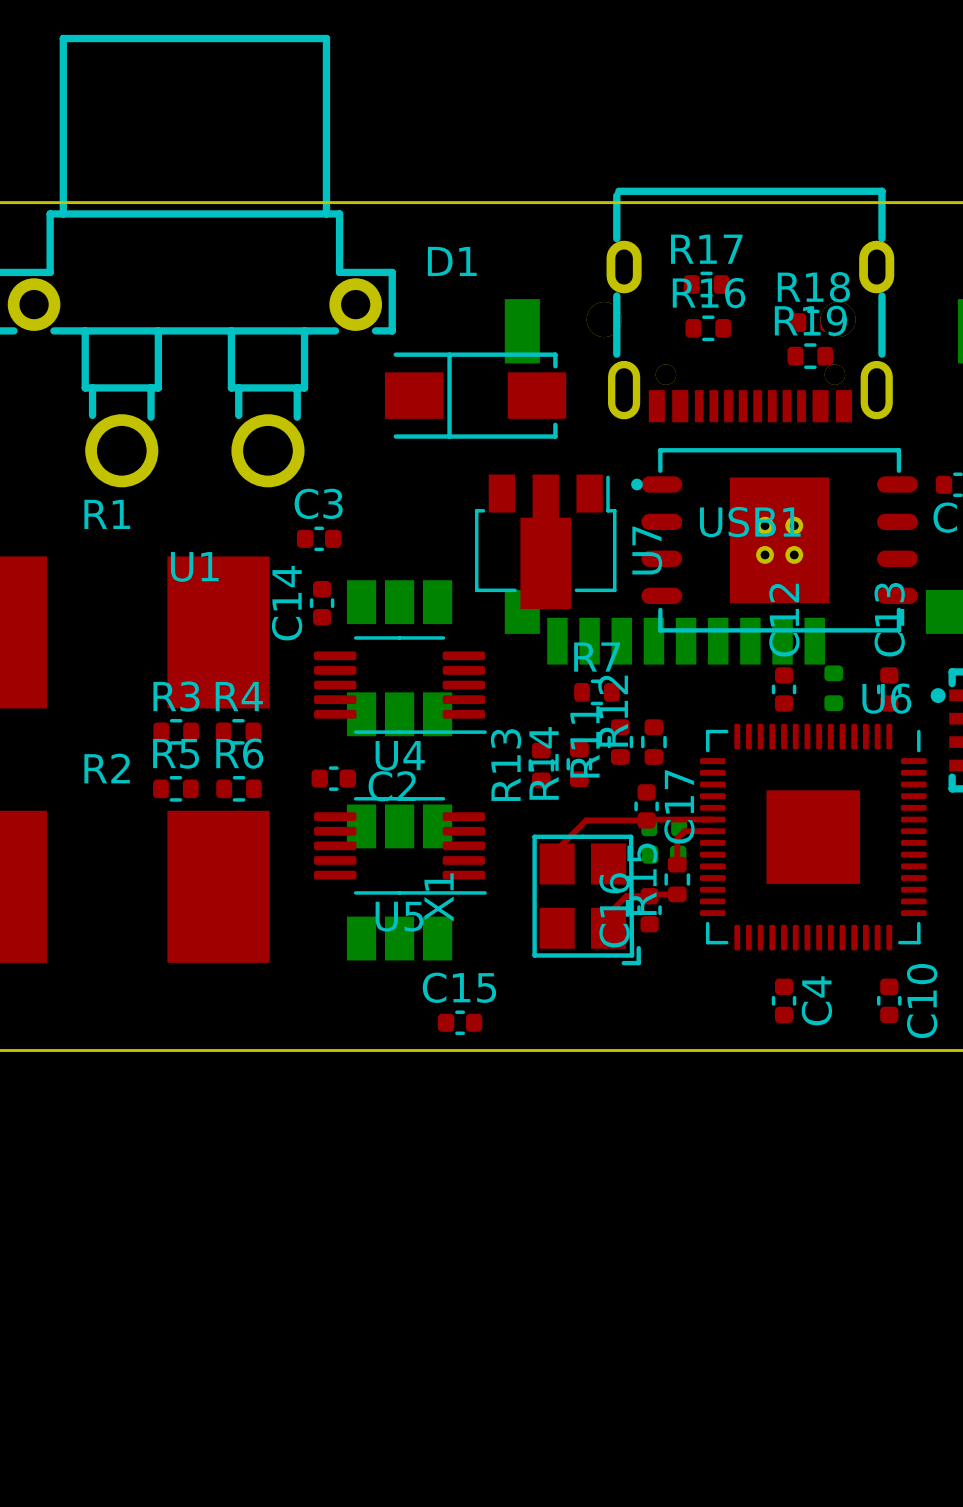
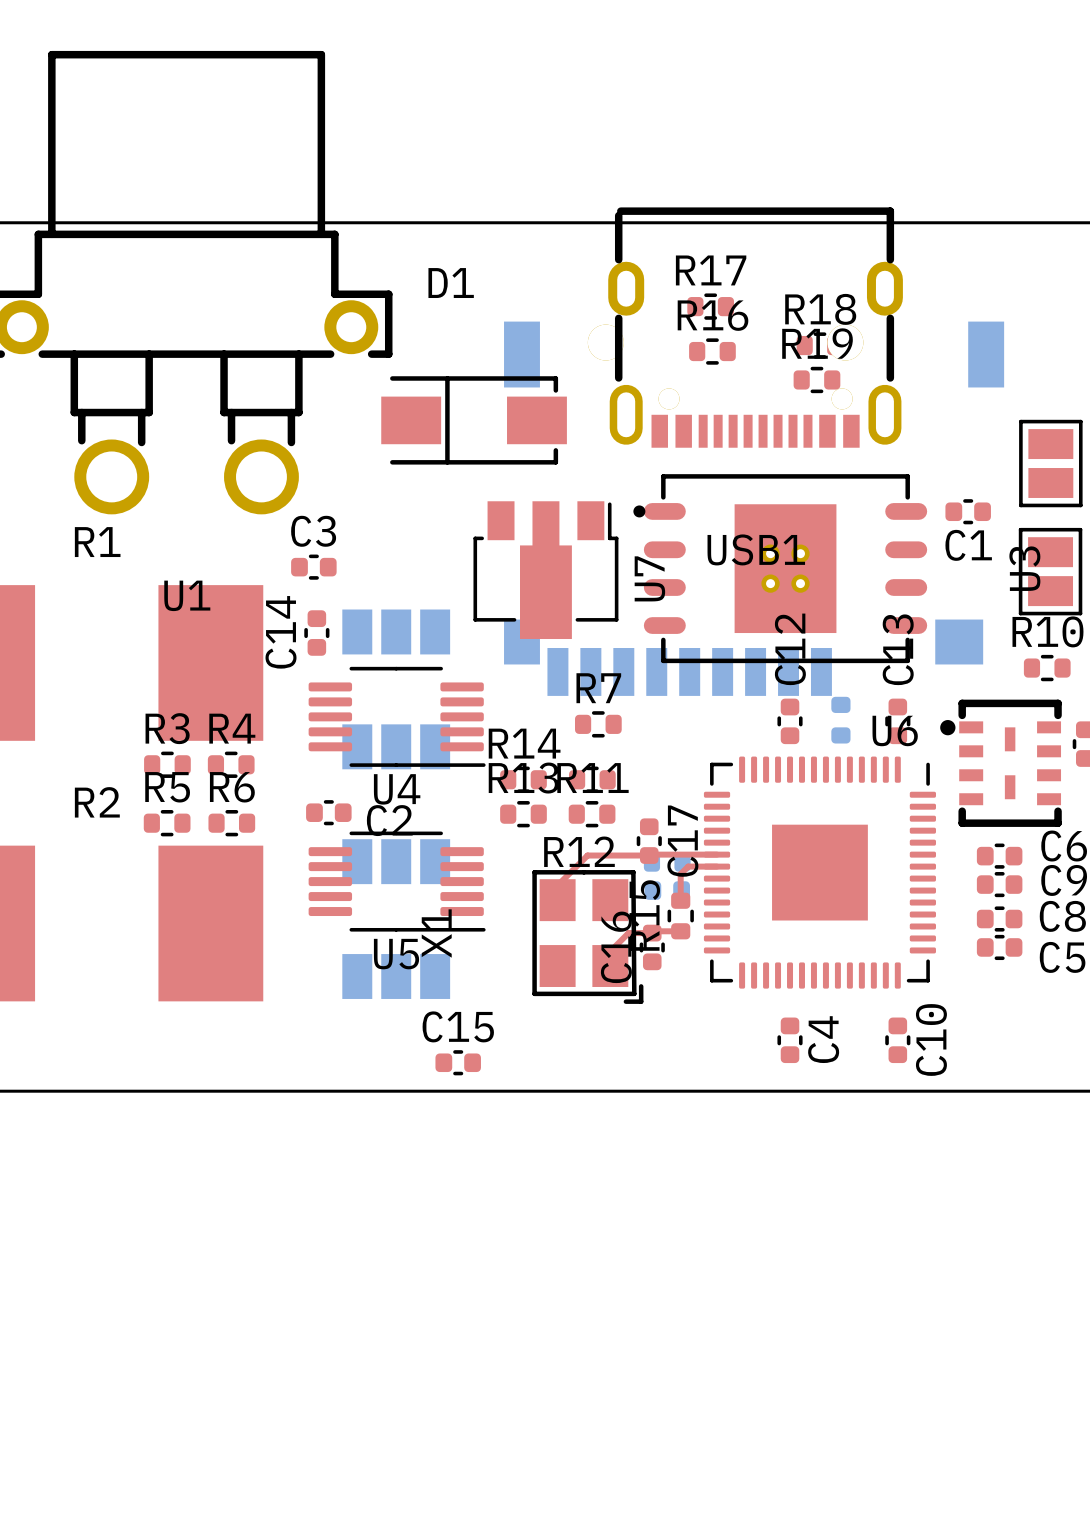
R12 name position: R12 (613, 711) -> R12 (579, 851)
R11 rotation: 0° (620, 742) -> 90° clockwise (592, 814)
R11 position: (620, 742) -> (592, 814)
R12 rotation: 0° (653, 742) -> 90° clockwise (592, 779)
R12 position: (653, 742) -> (592, 779)
R14 rotation: 0° (579, 764) -> 90° clockwise (523, 779)
R14 position: (579, 764) -> (523, 779)
R13 rotation: 0° (541, 765) -> 90° clockwise (523, 814)

